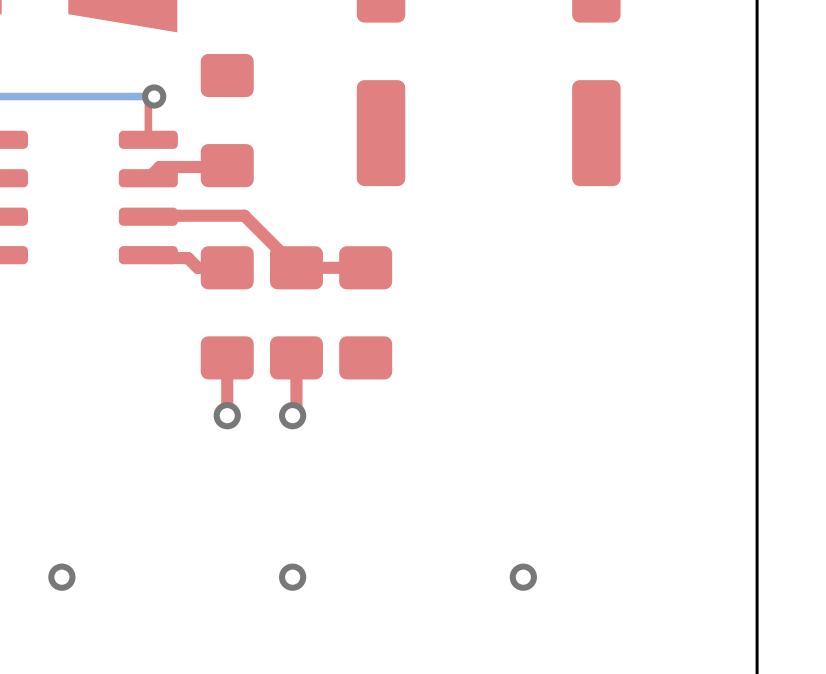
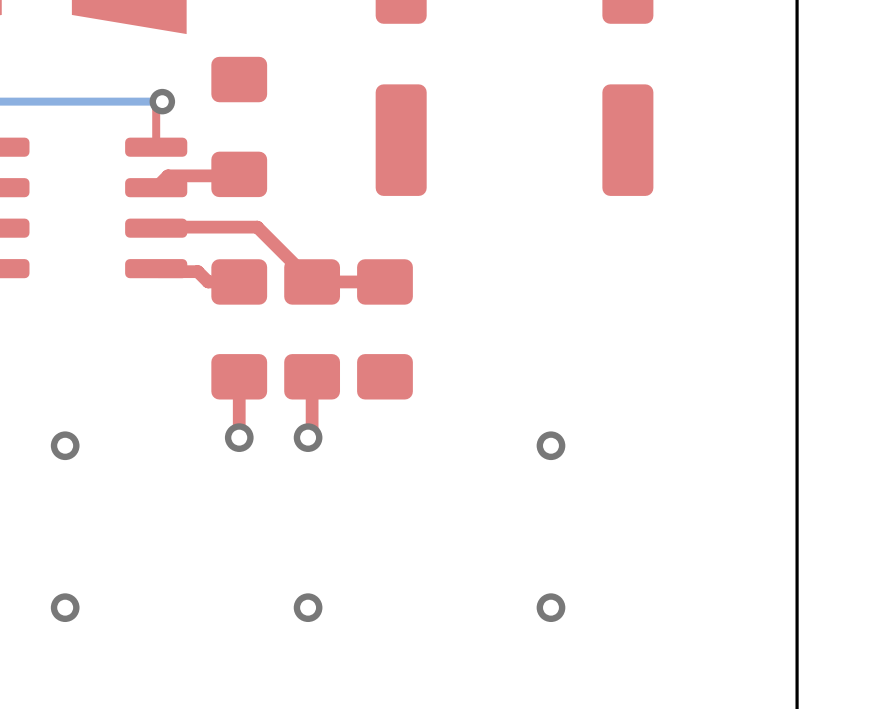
via: none -> (65, 445)
via: none -> (550, 445)

